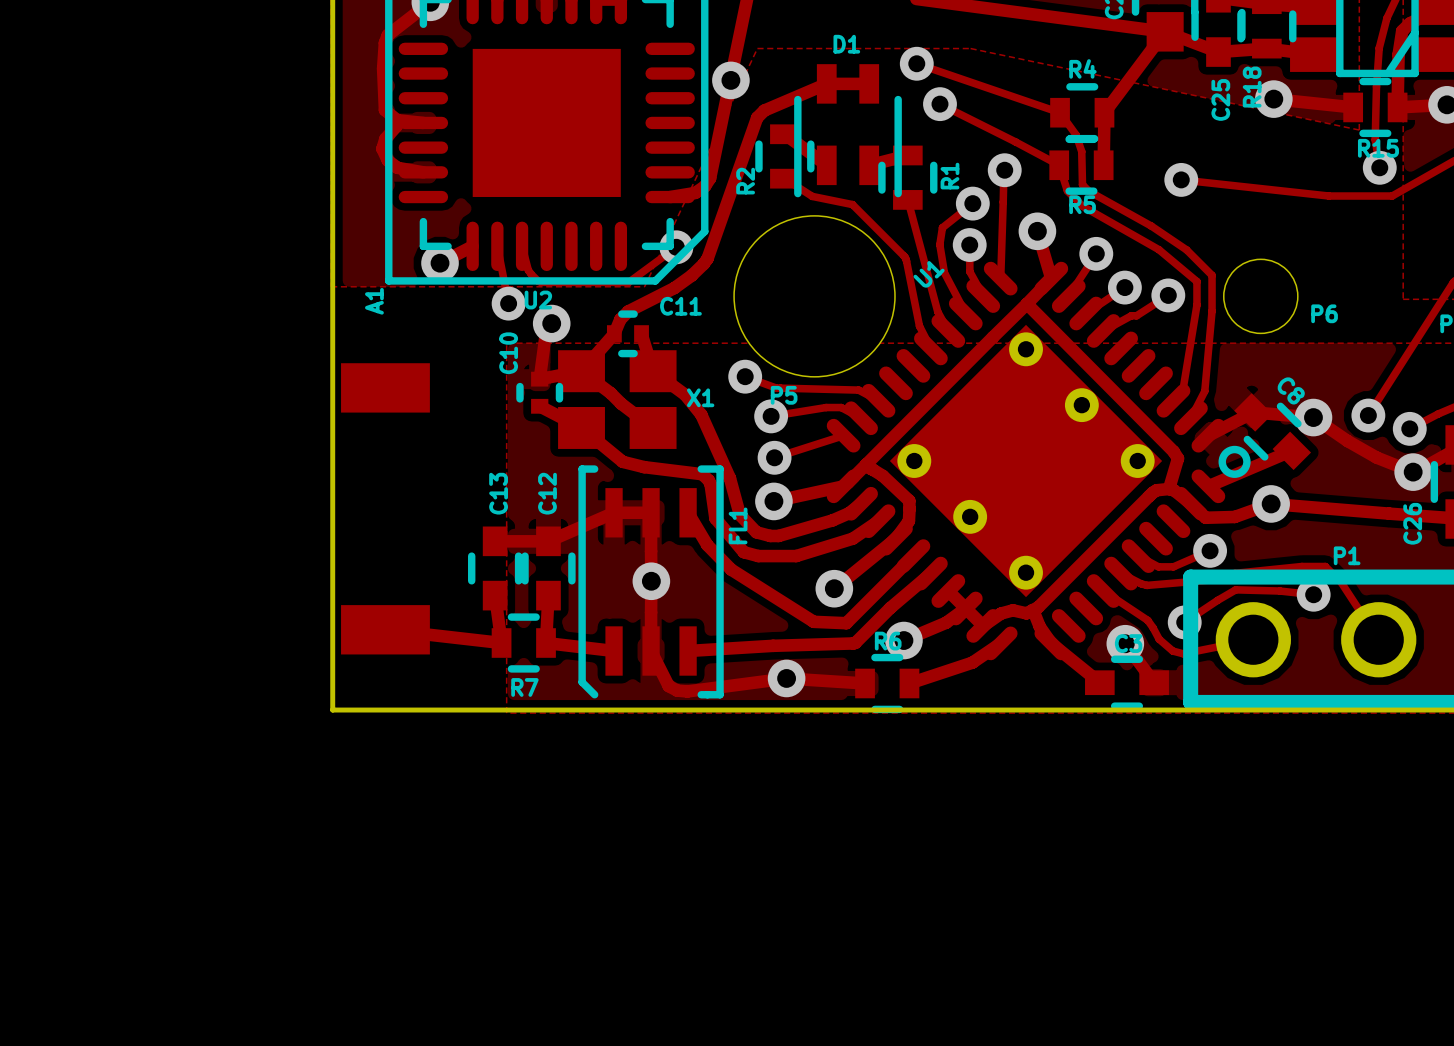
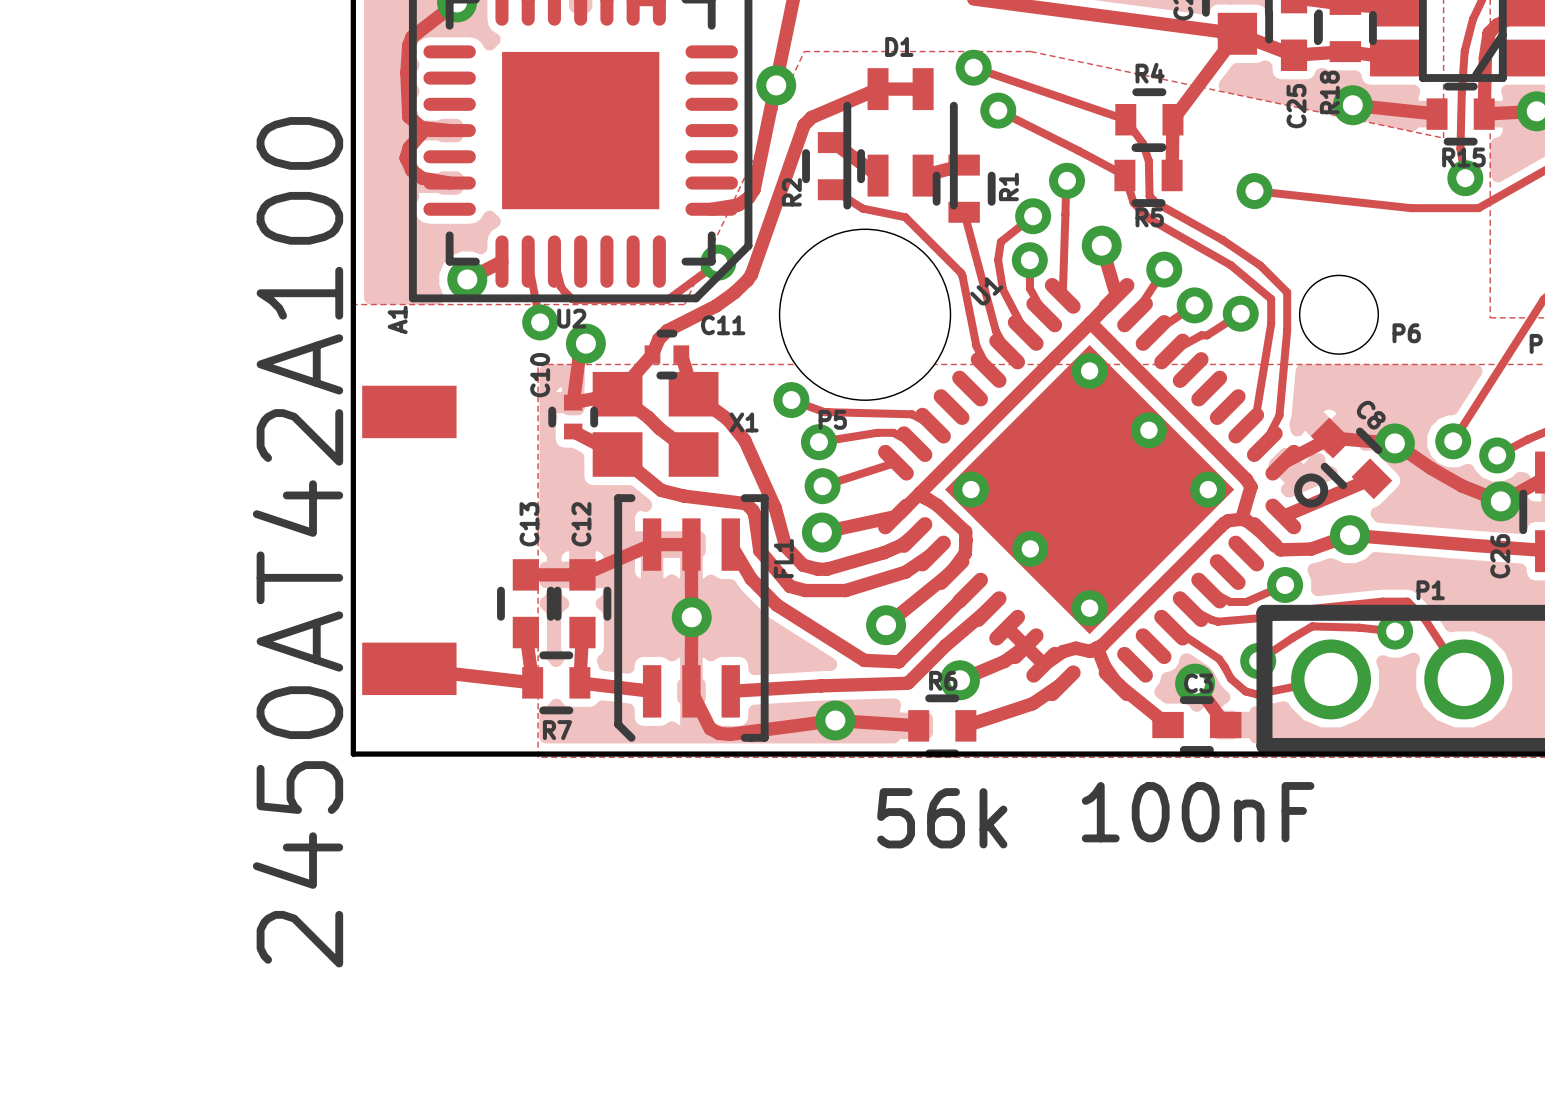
A1 value: none -> 2450AT42A100 (298, 542)
C3 value: none -> 100nF (1198, 812)
R6 value: none -> 56k (942, 818)

